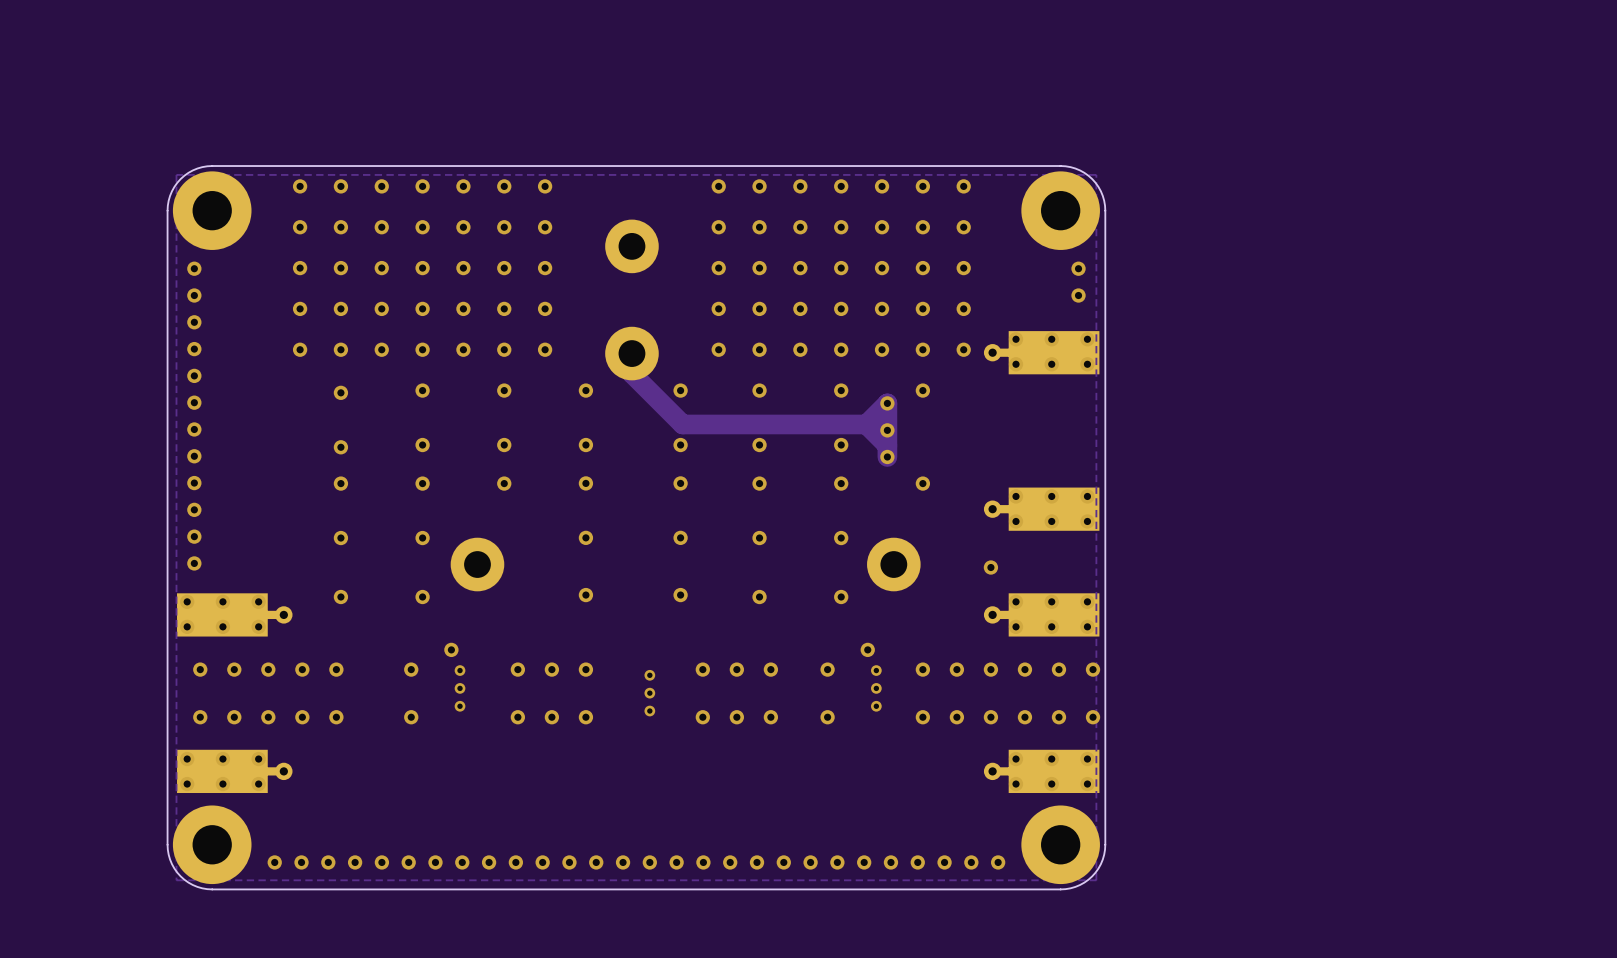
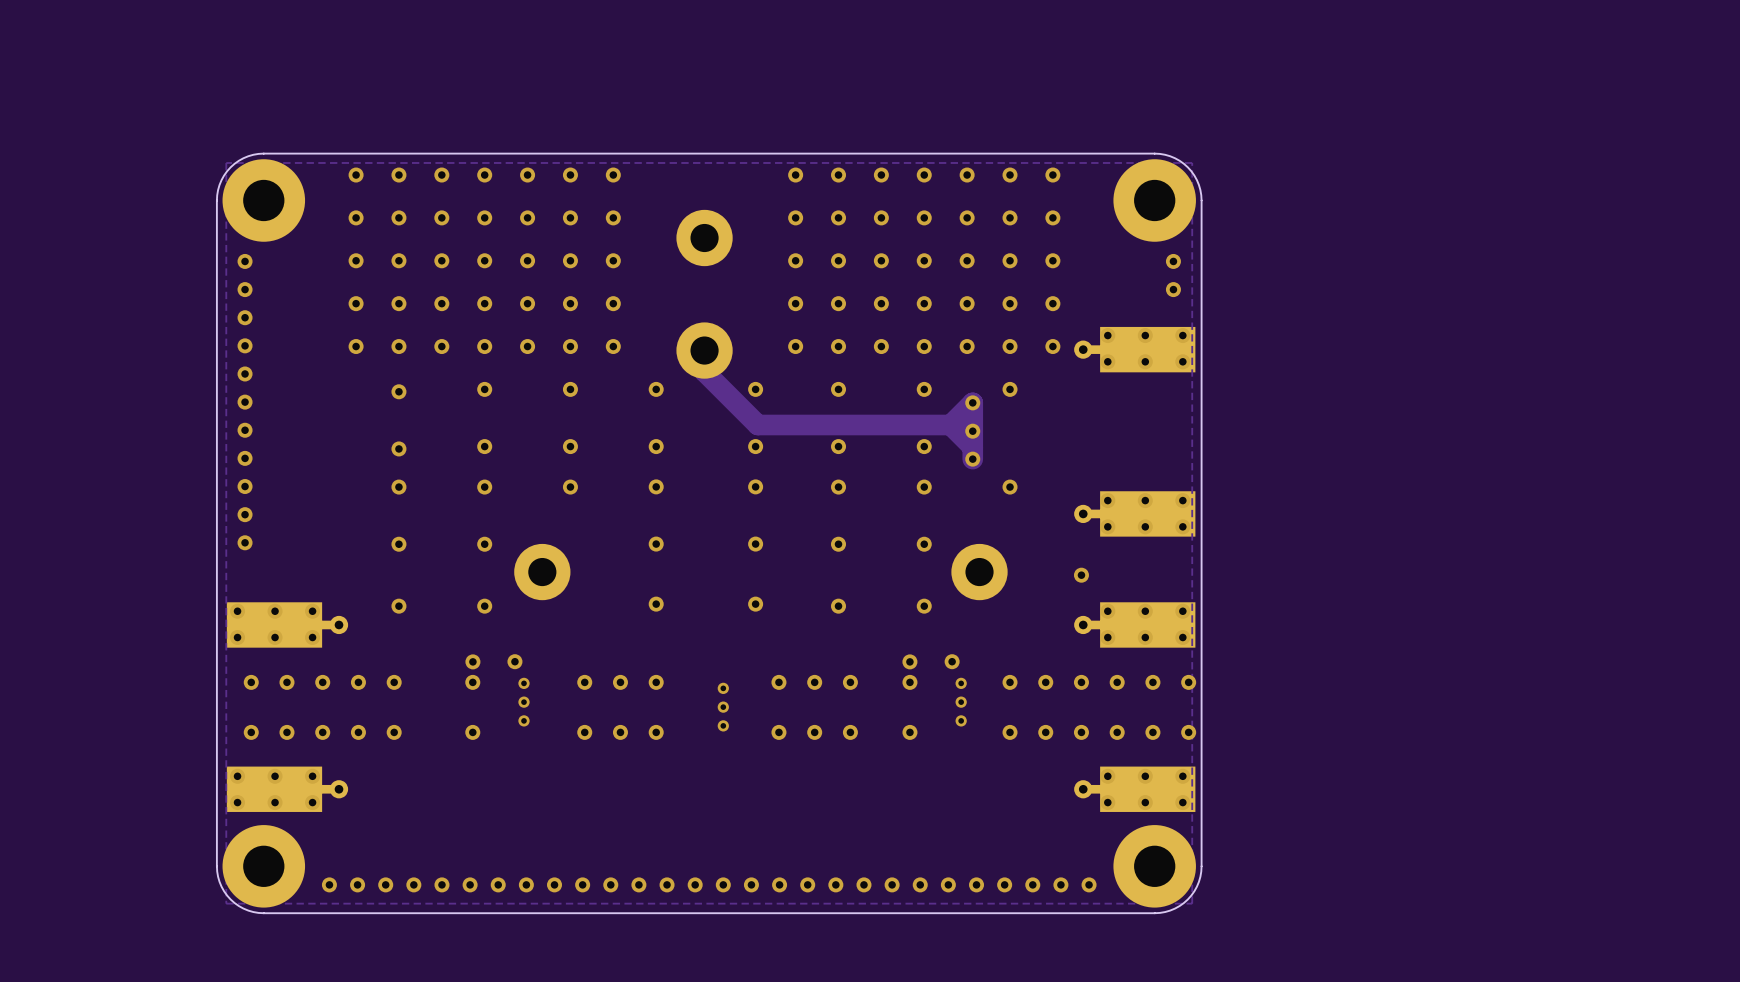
via: (194, 563) -> none
via: none -> (472, 661)
via: none -> (909, 661)

